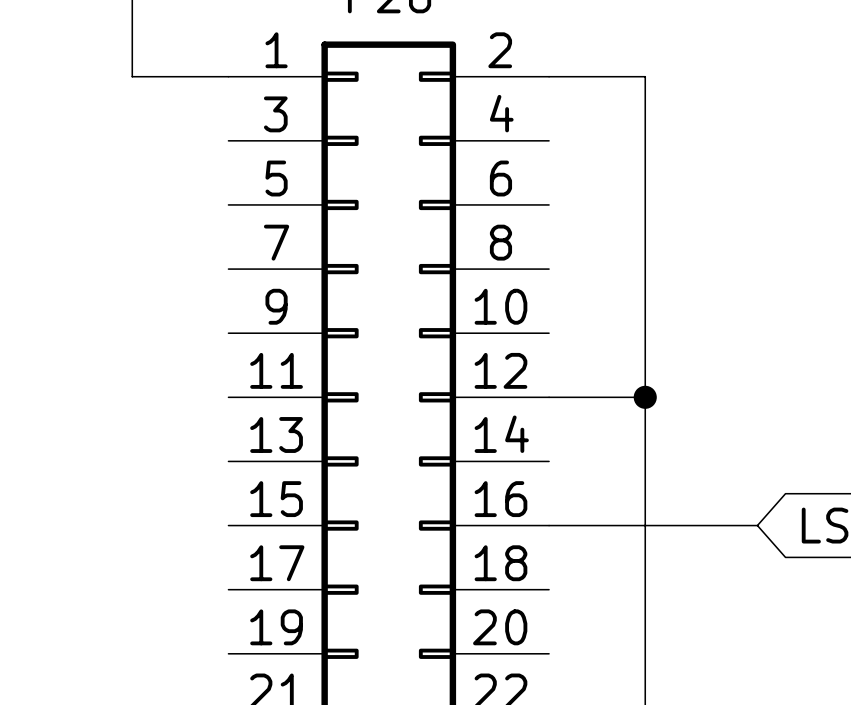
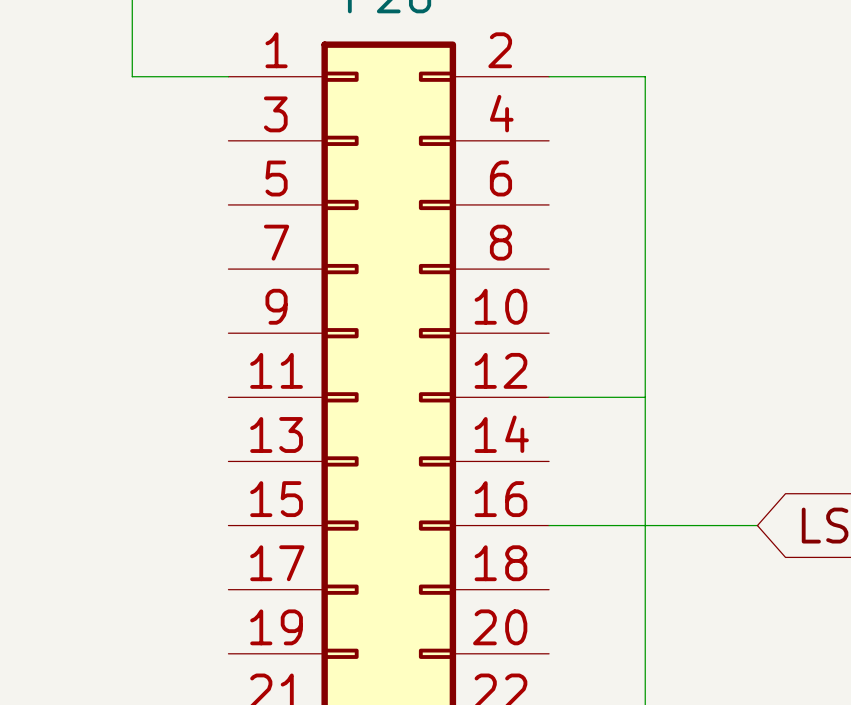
junction: (645, 397) -> none

